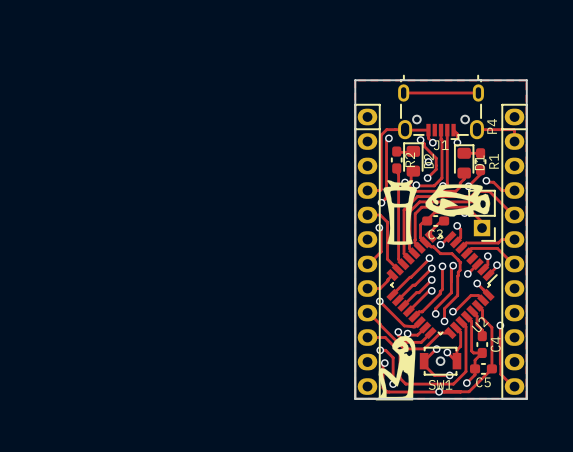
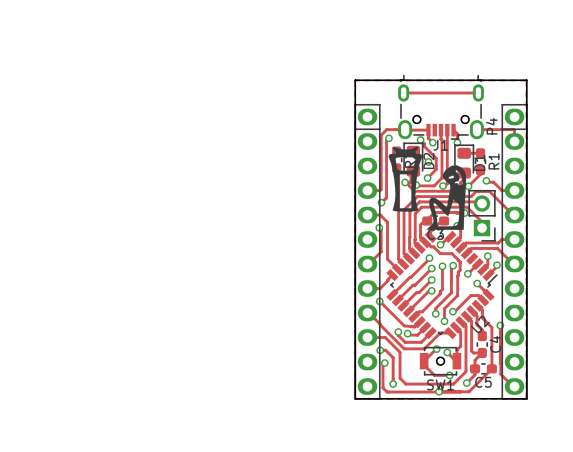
drawing: [425, 184, 490, 217] -> none
drawing position: (400, 212) -> (405, 179)
drawing position: (395, 368) -> (446, 197)

